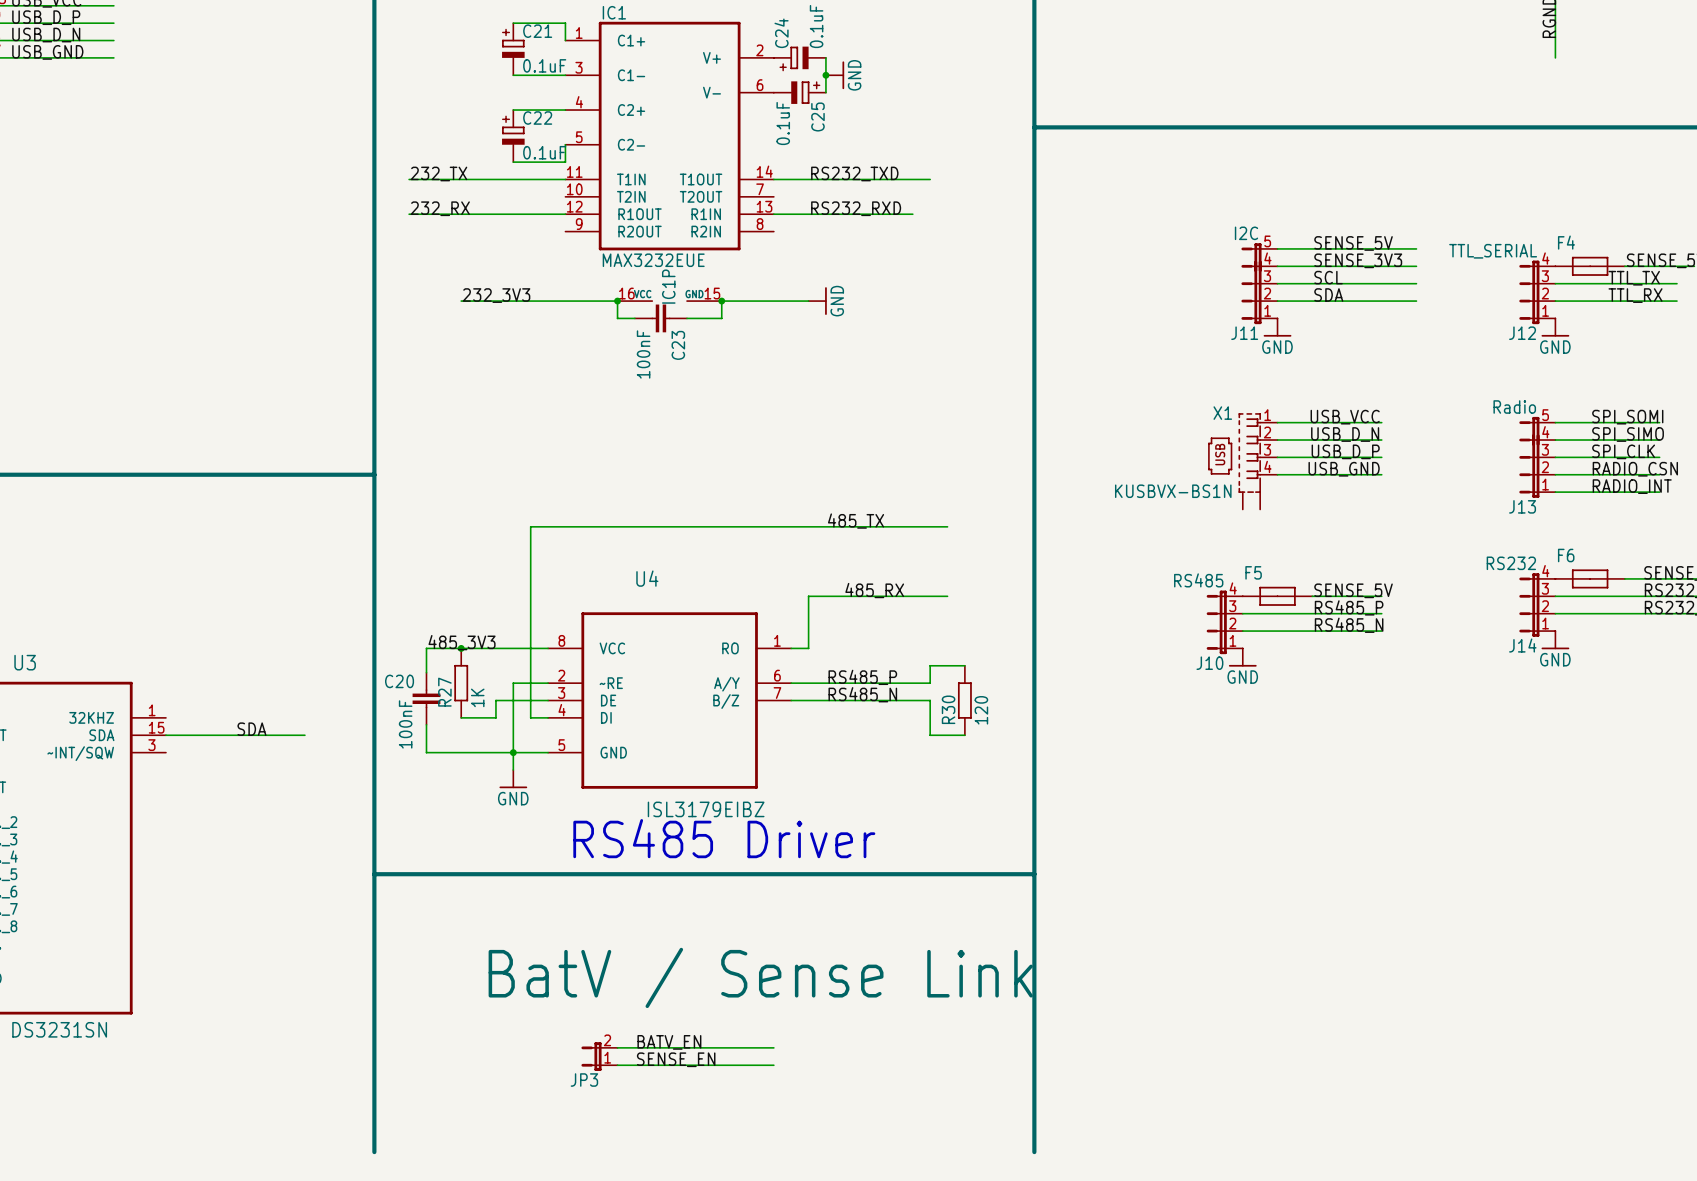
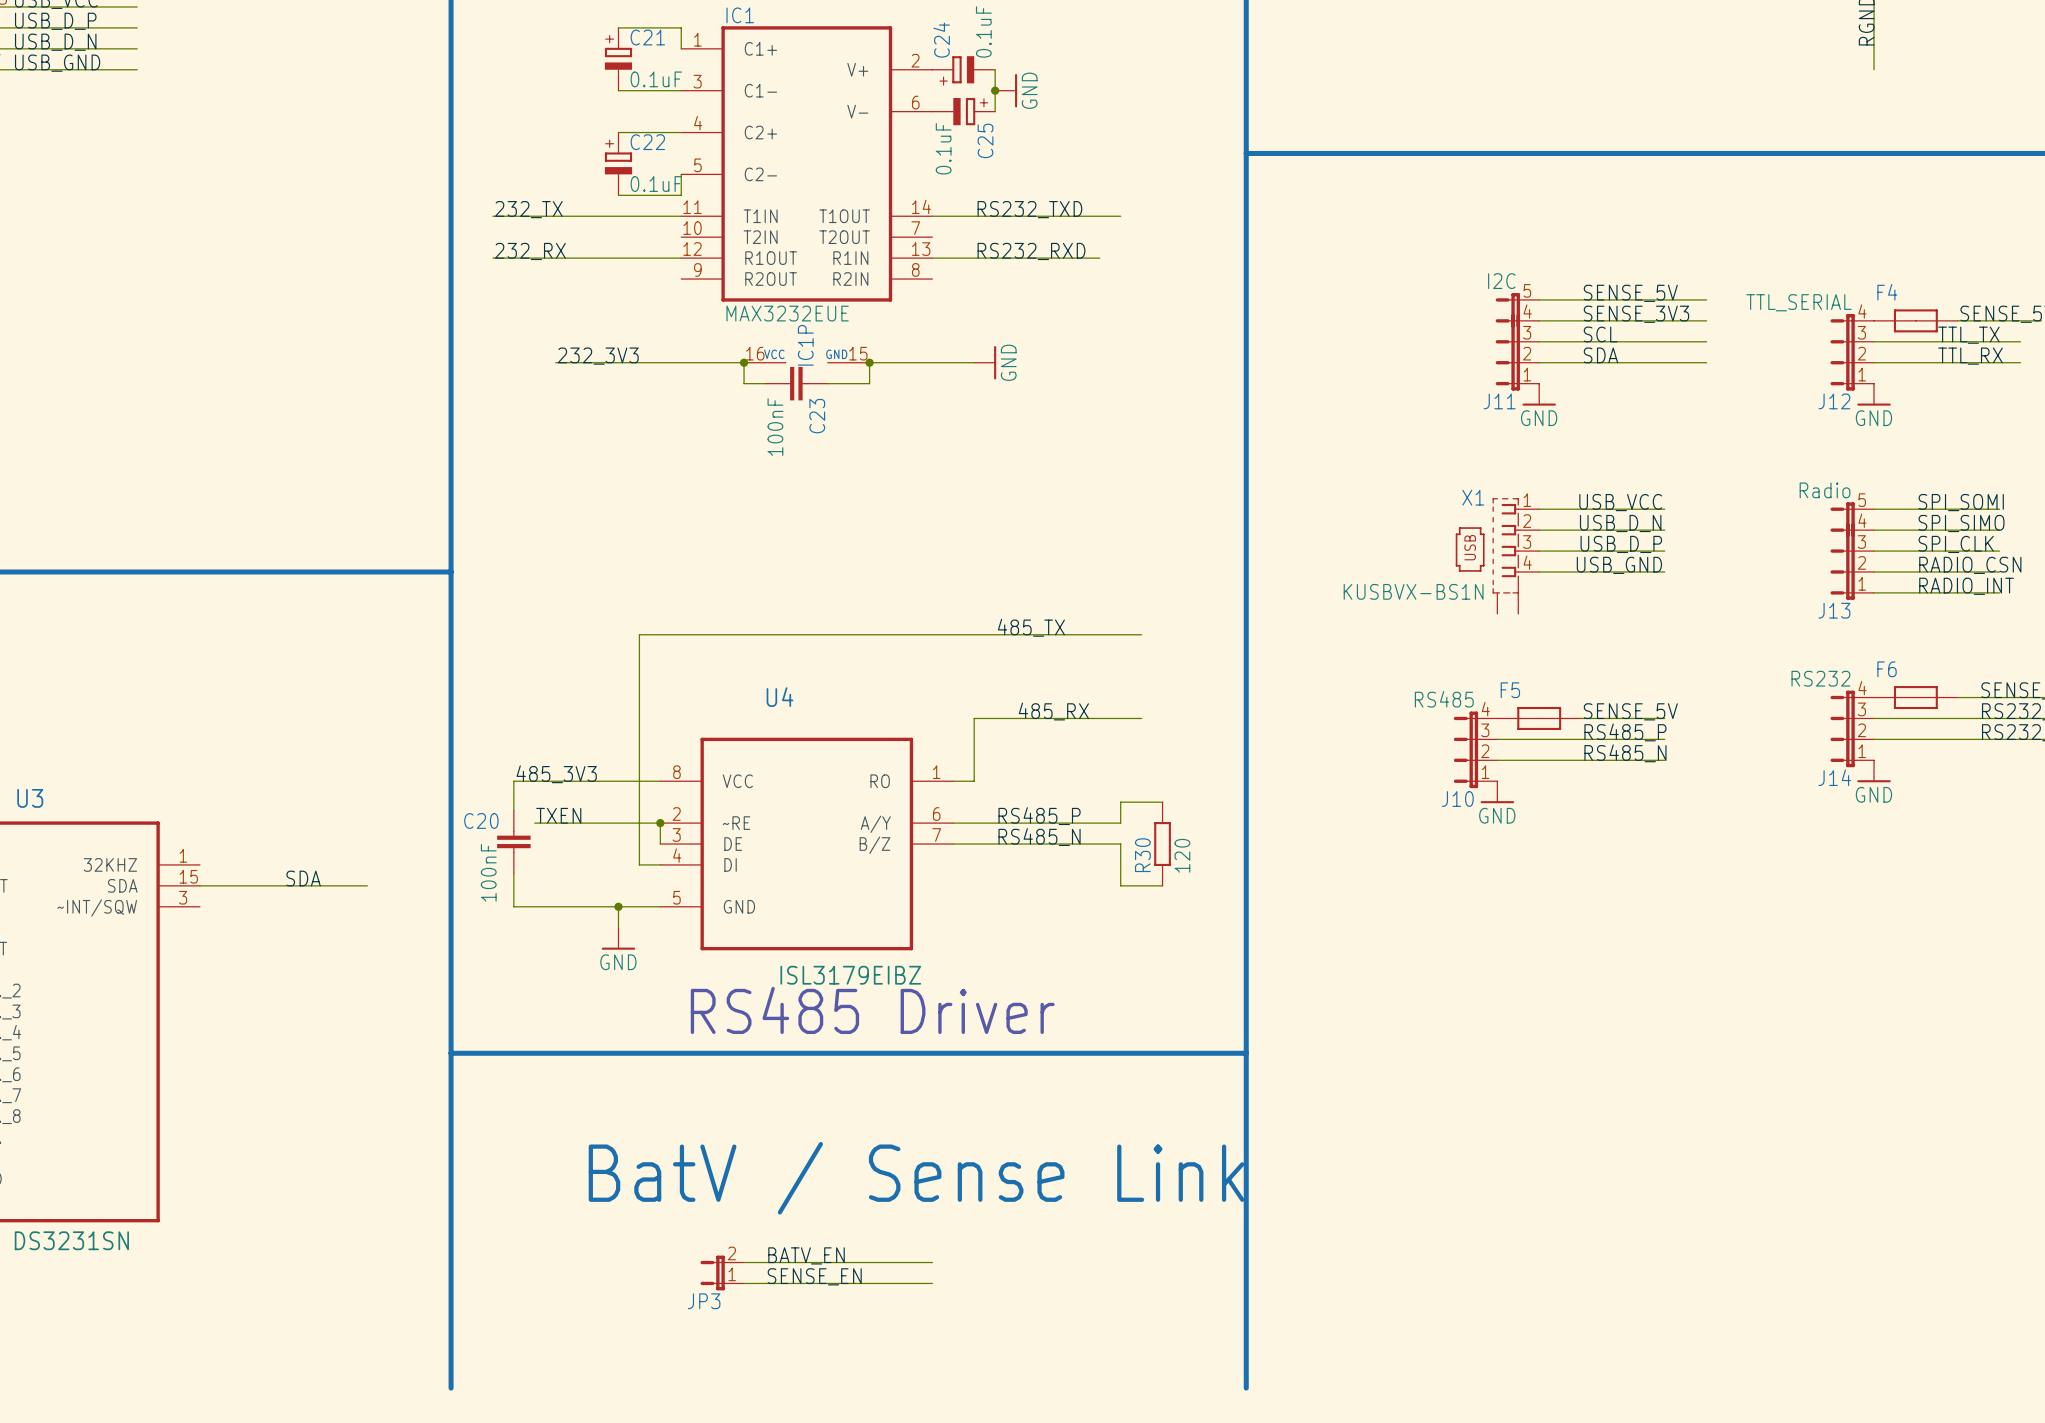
junction: (461, 648) -> none
label: none -> TXEN (558, 815)
R27: 1K (461, 683) -> none
wire: (513, 683) (513, 752) -> (618, 823) (534, 823)
junction: none -> (660, 823)
wire: (548, 700) (495, 700) (495, 717) (461, 717) -> (660, 844) (660, 823)

